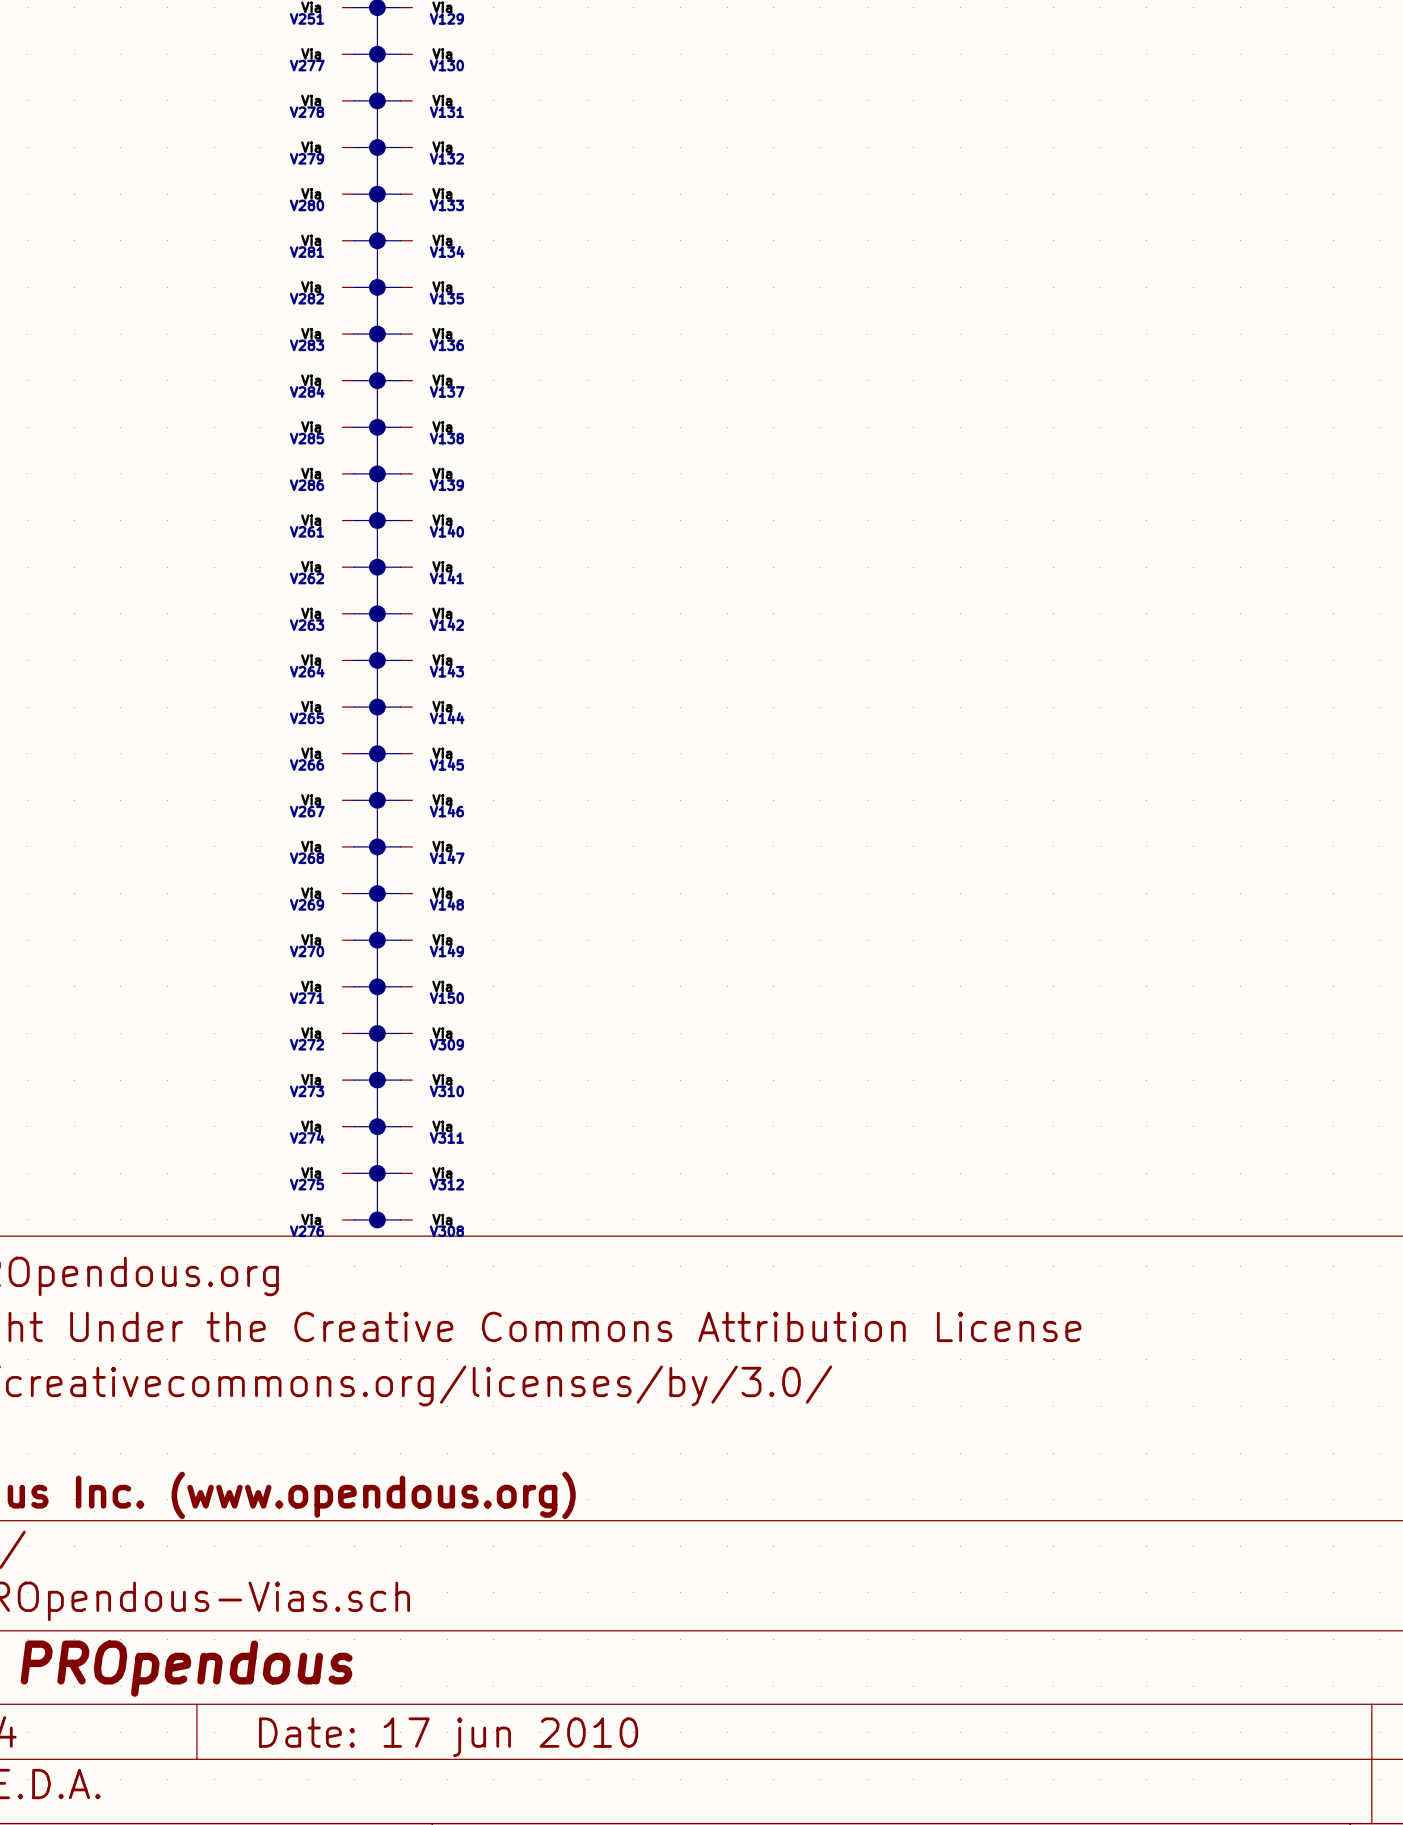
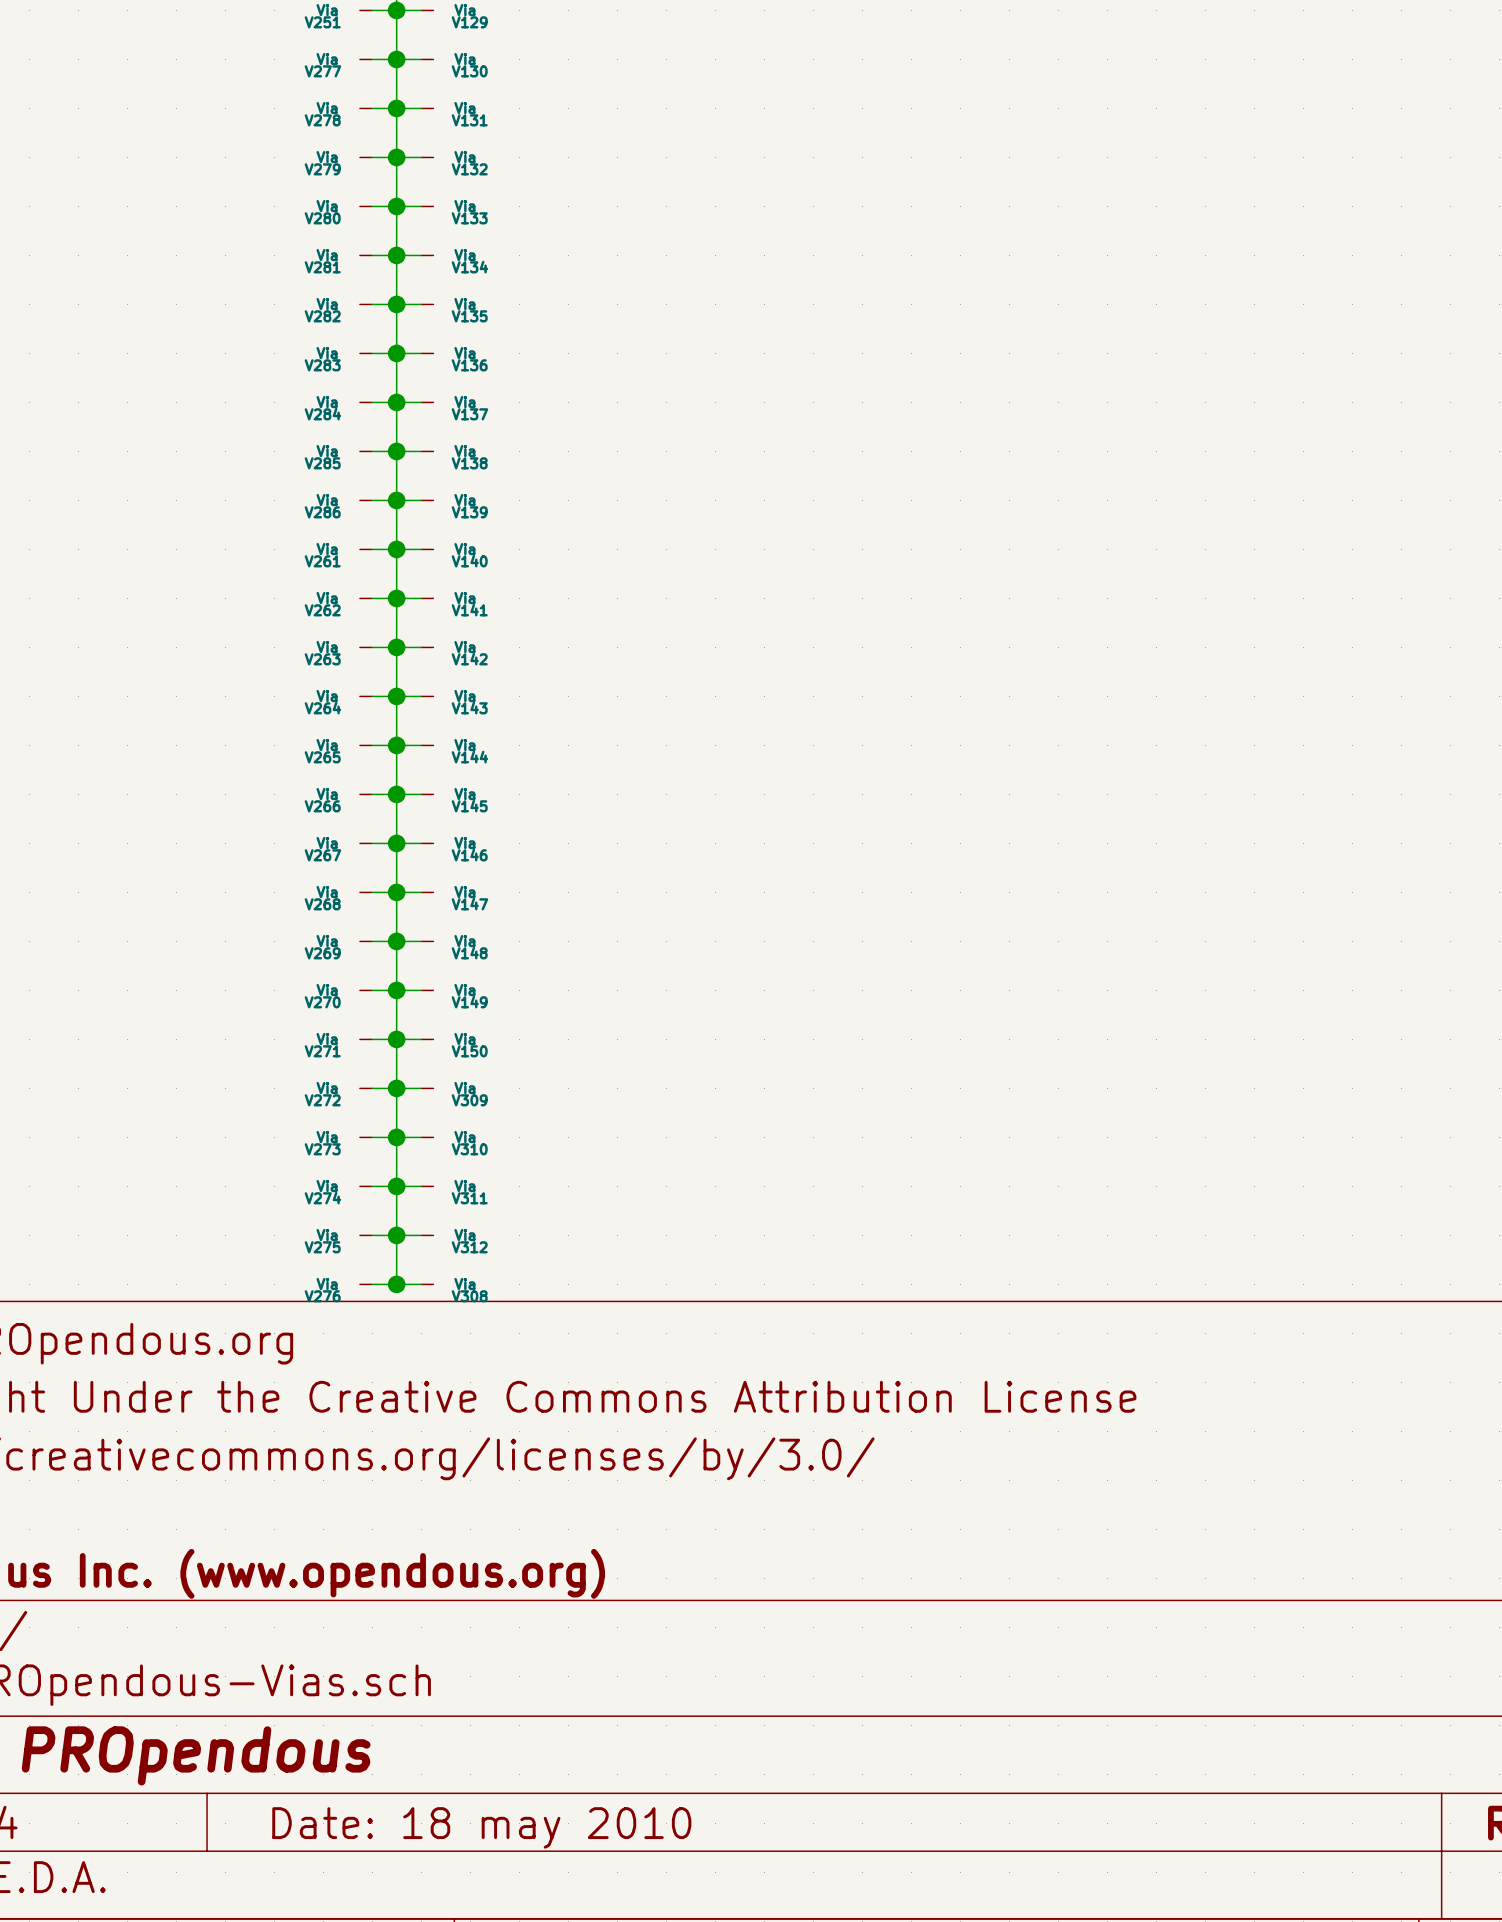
title block: Date: 17 jun 2010 (448, 1737) -> Date: 18 may 2010 (481, 1827)

